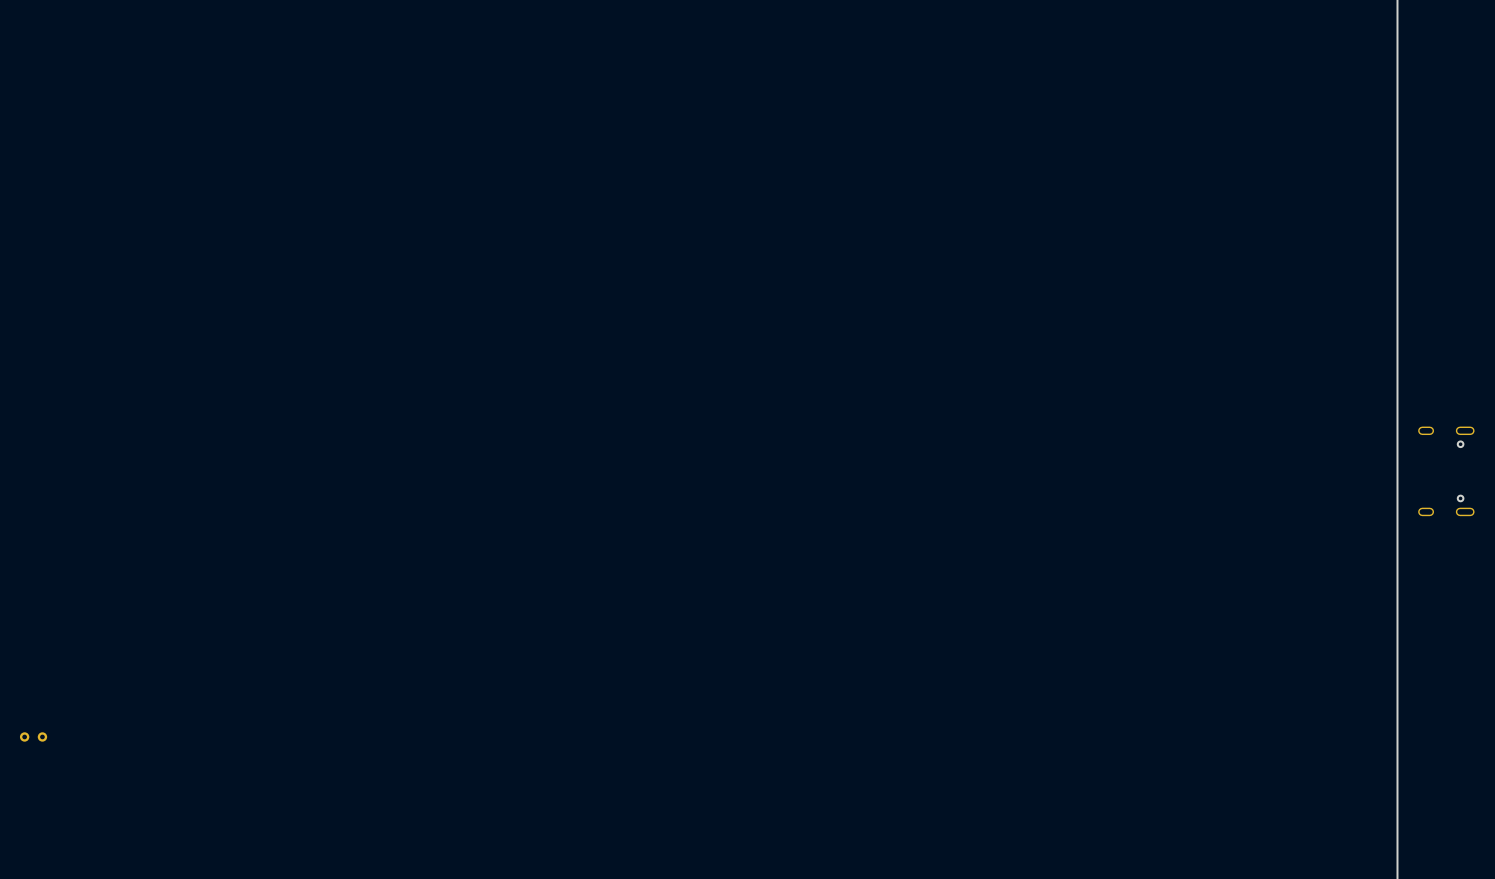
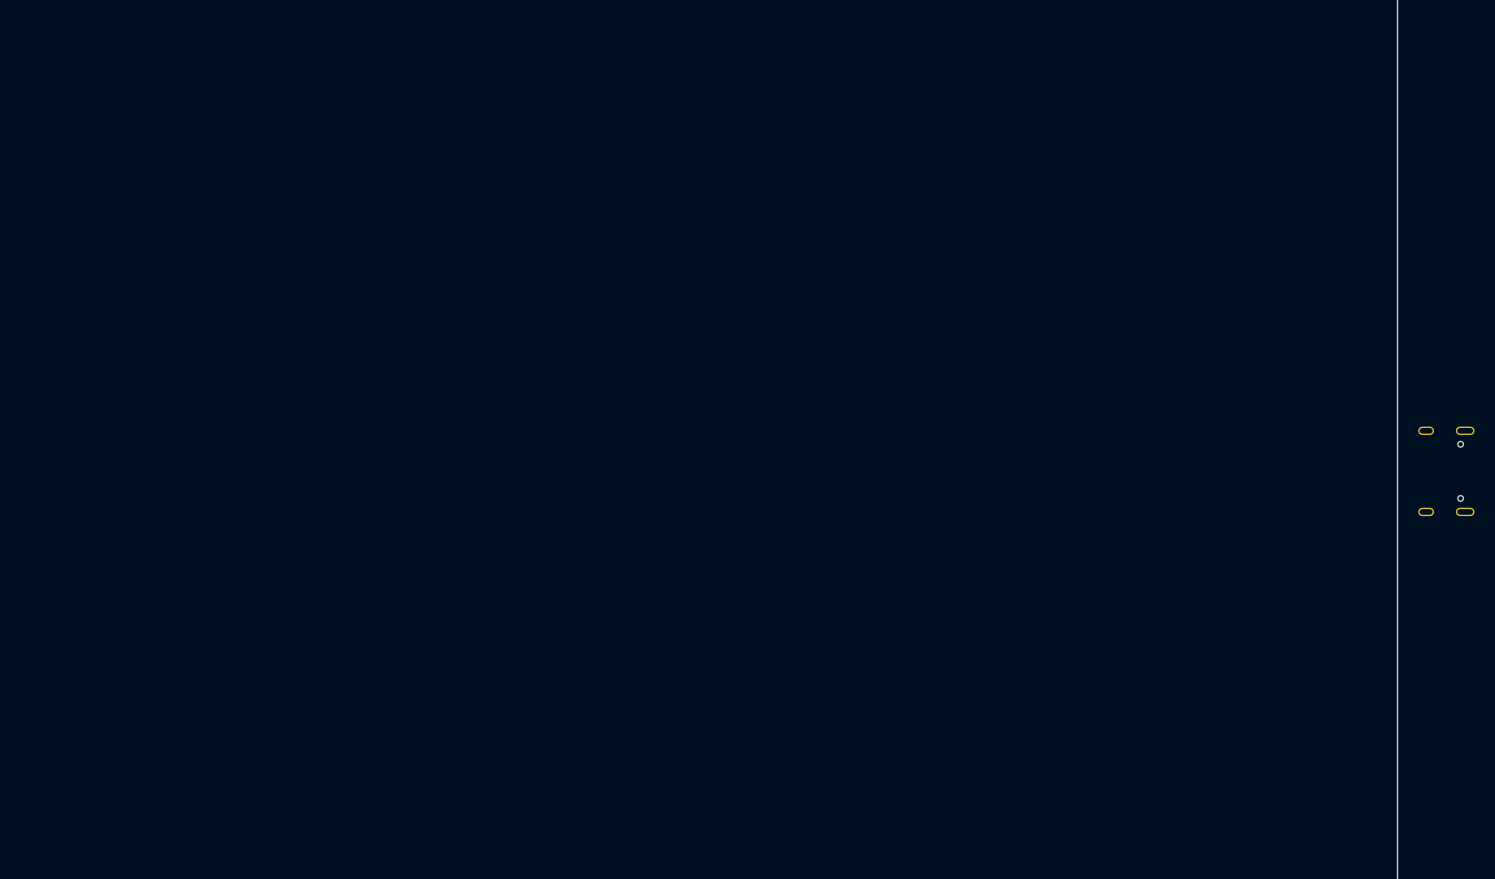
part: (33, 736) -> none

